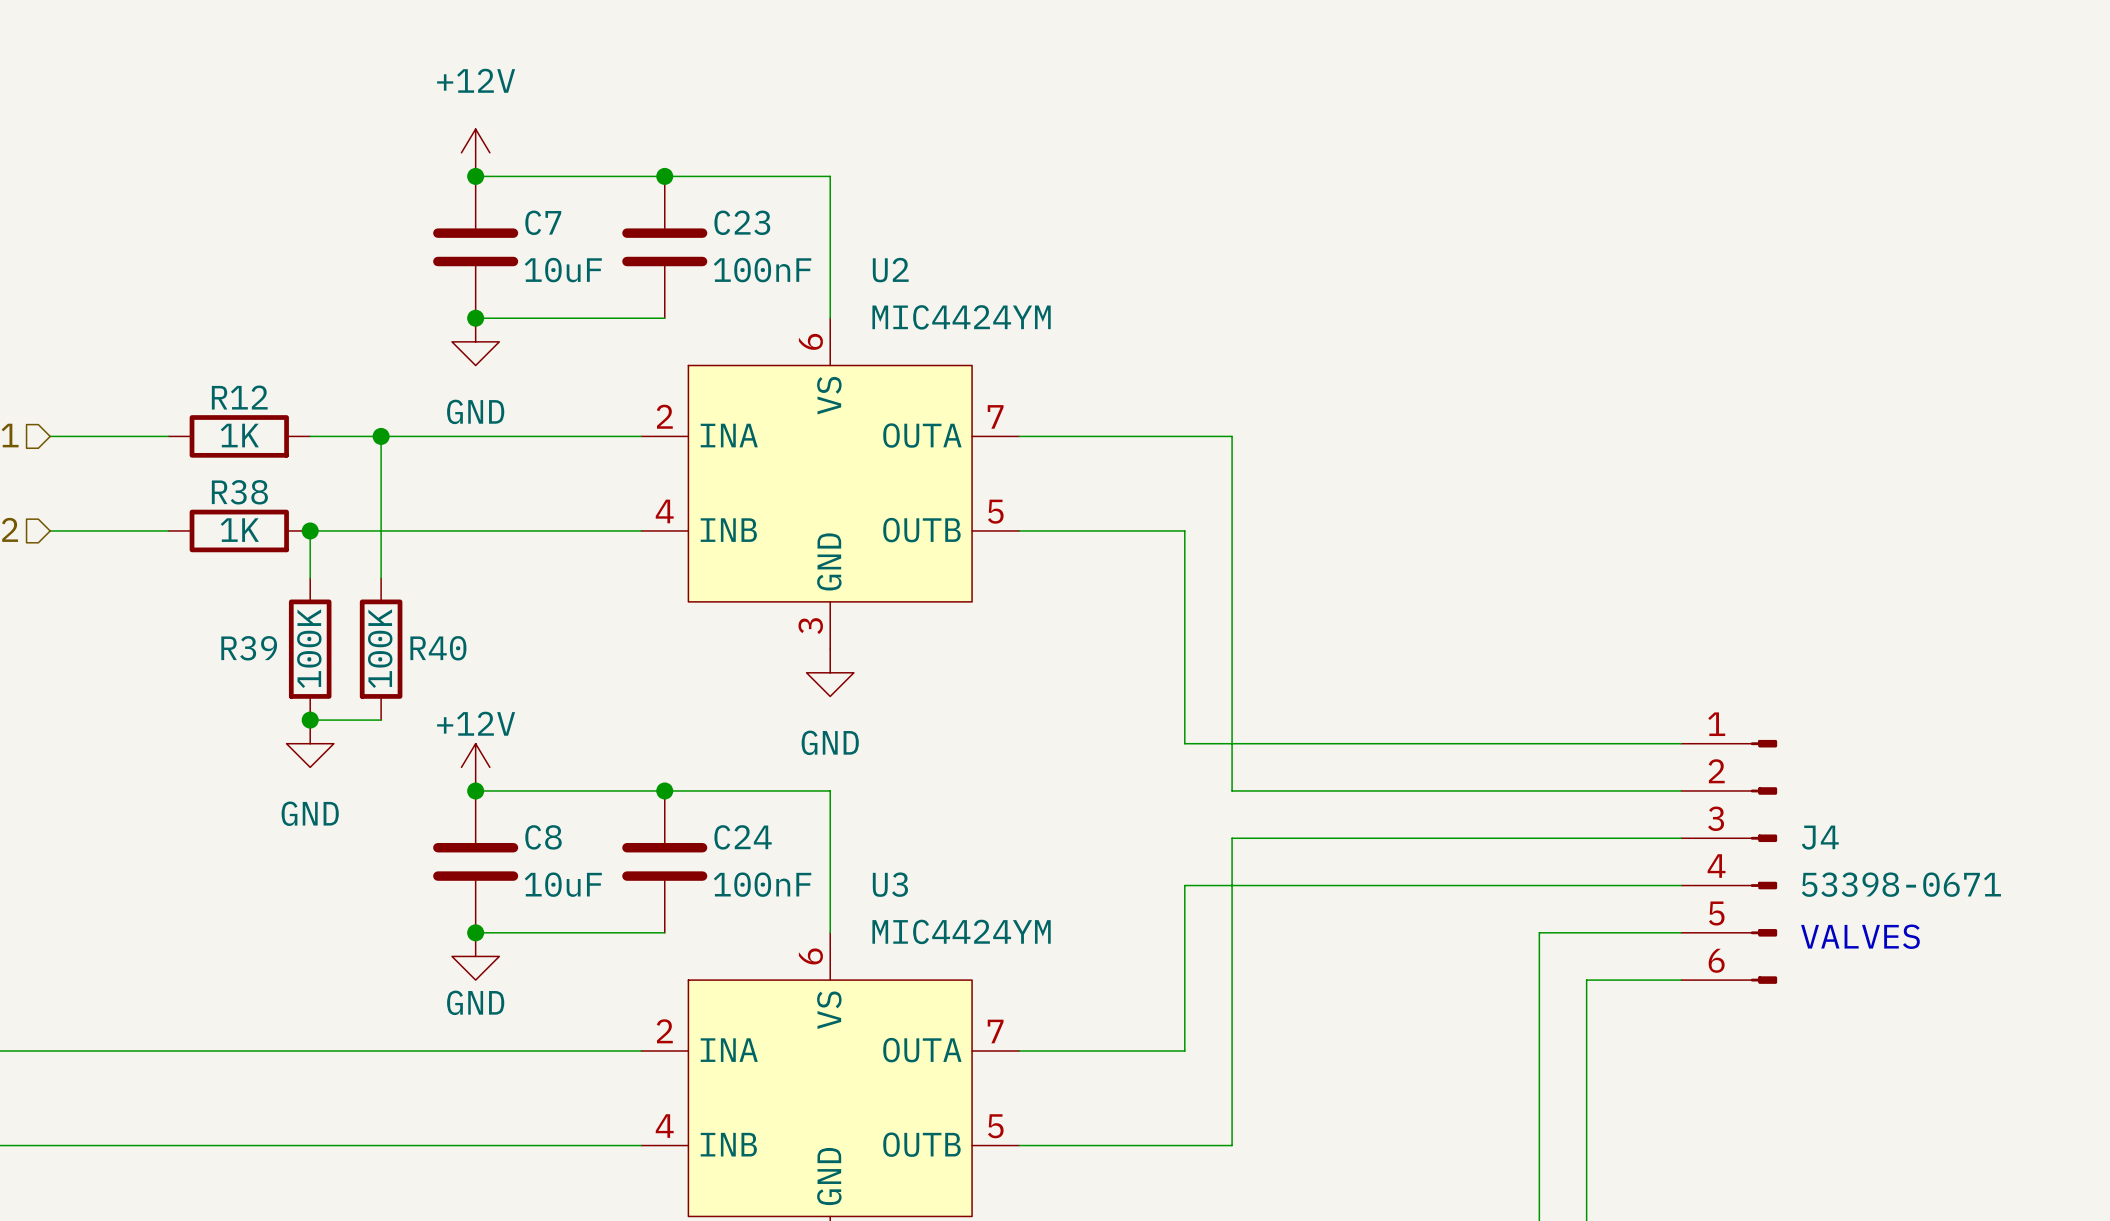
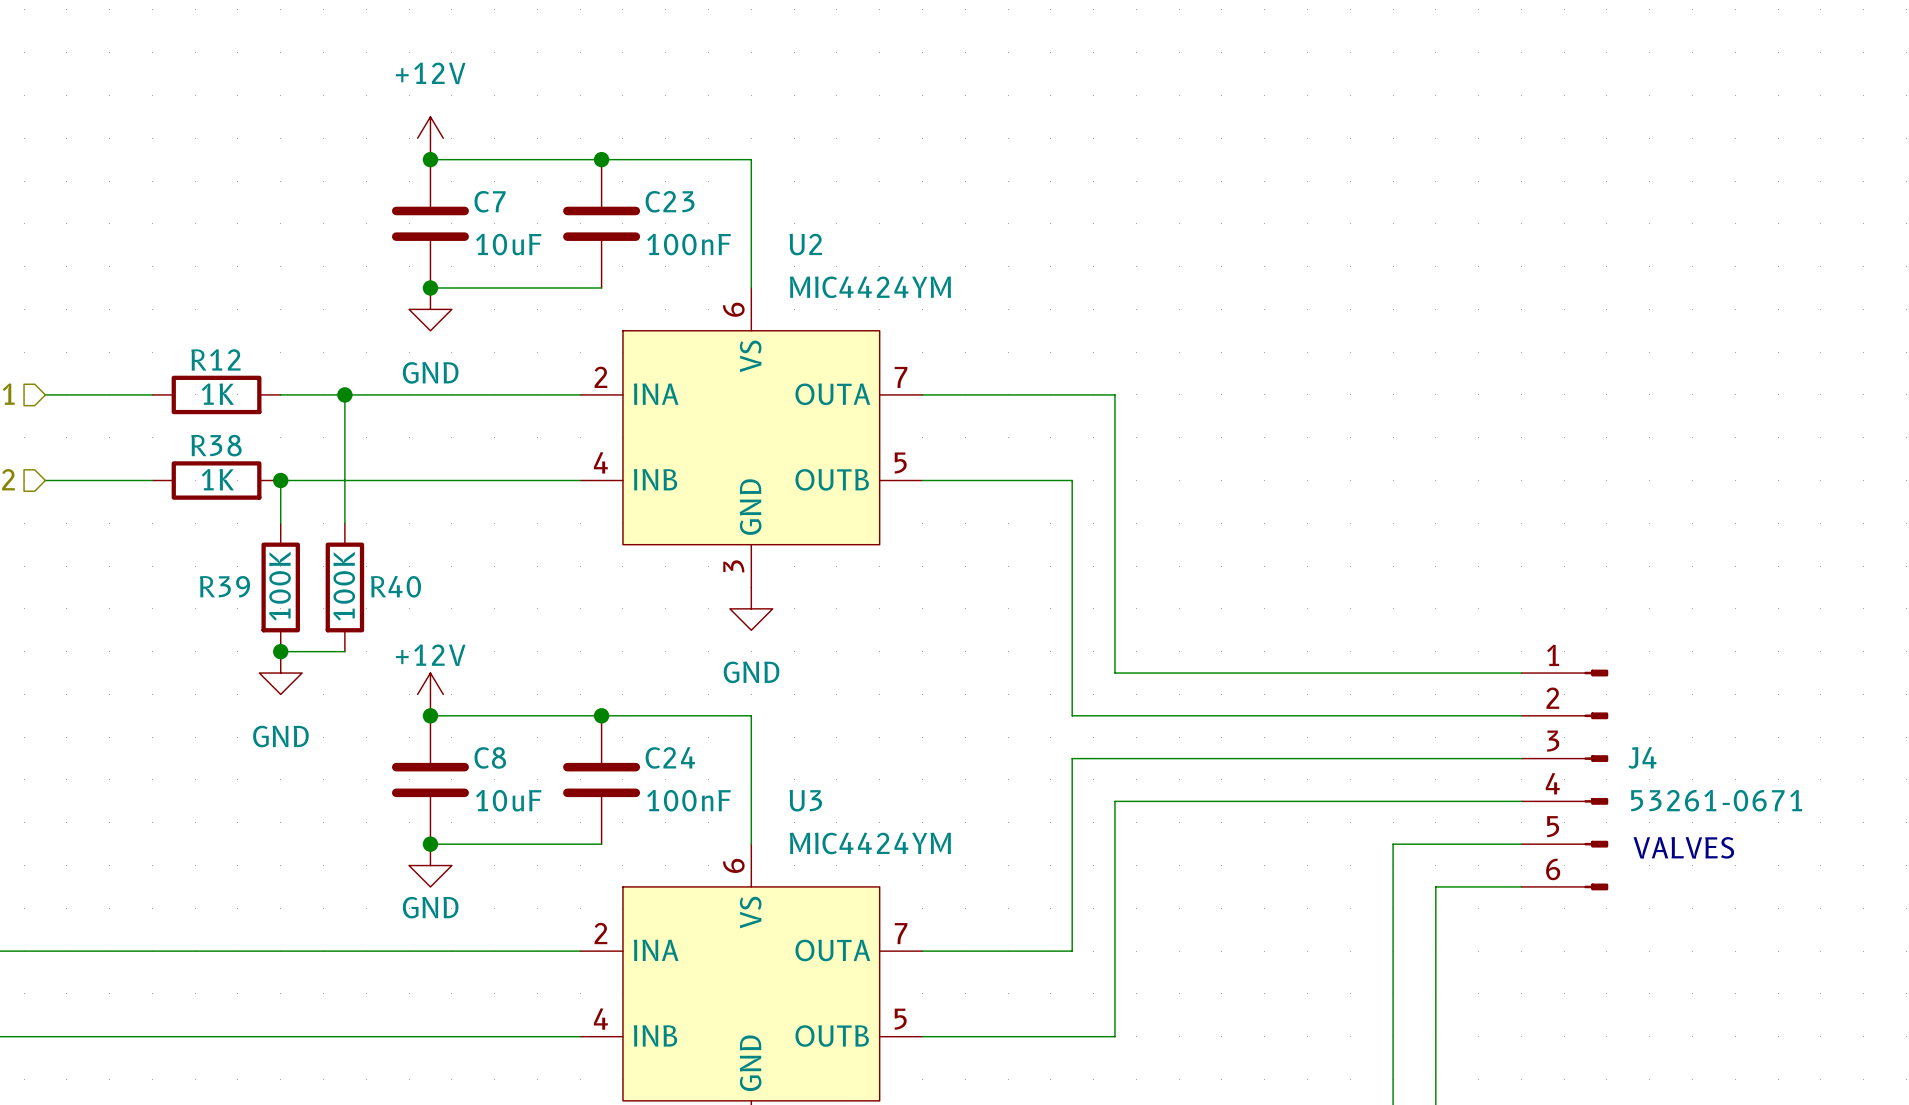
wire: (1184, 743) (1232, 743) (1232, 790) -> (1072, 673) (1072, 715) (1114, 715)
wire: (1232, 838) (1232, 885) (1184, 885) -> (1114, 758) (1072, 758) (1072, 801)
J4 value: 53398-0671 (1901, 884) -> 53261-0671 (1716, 800)

